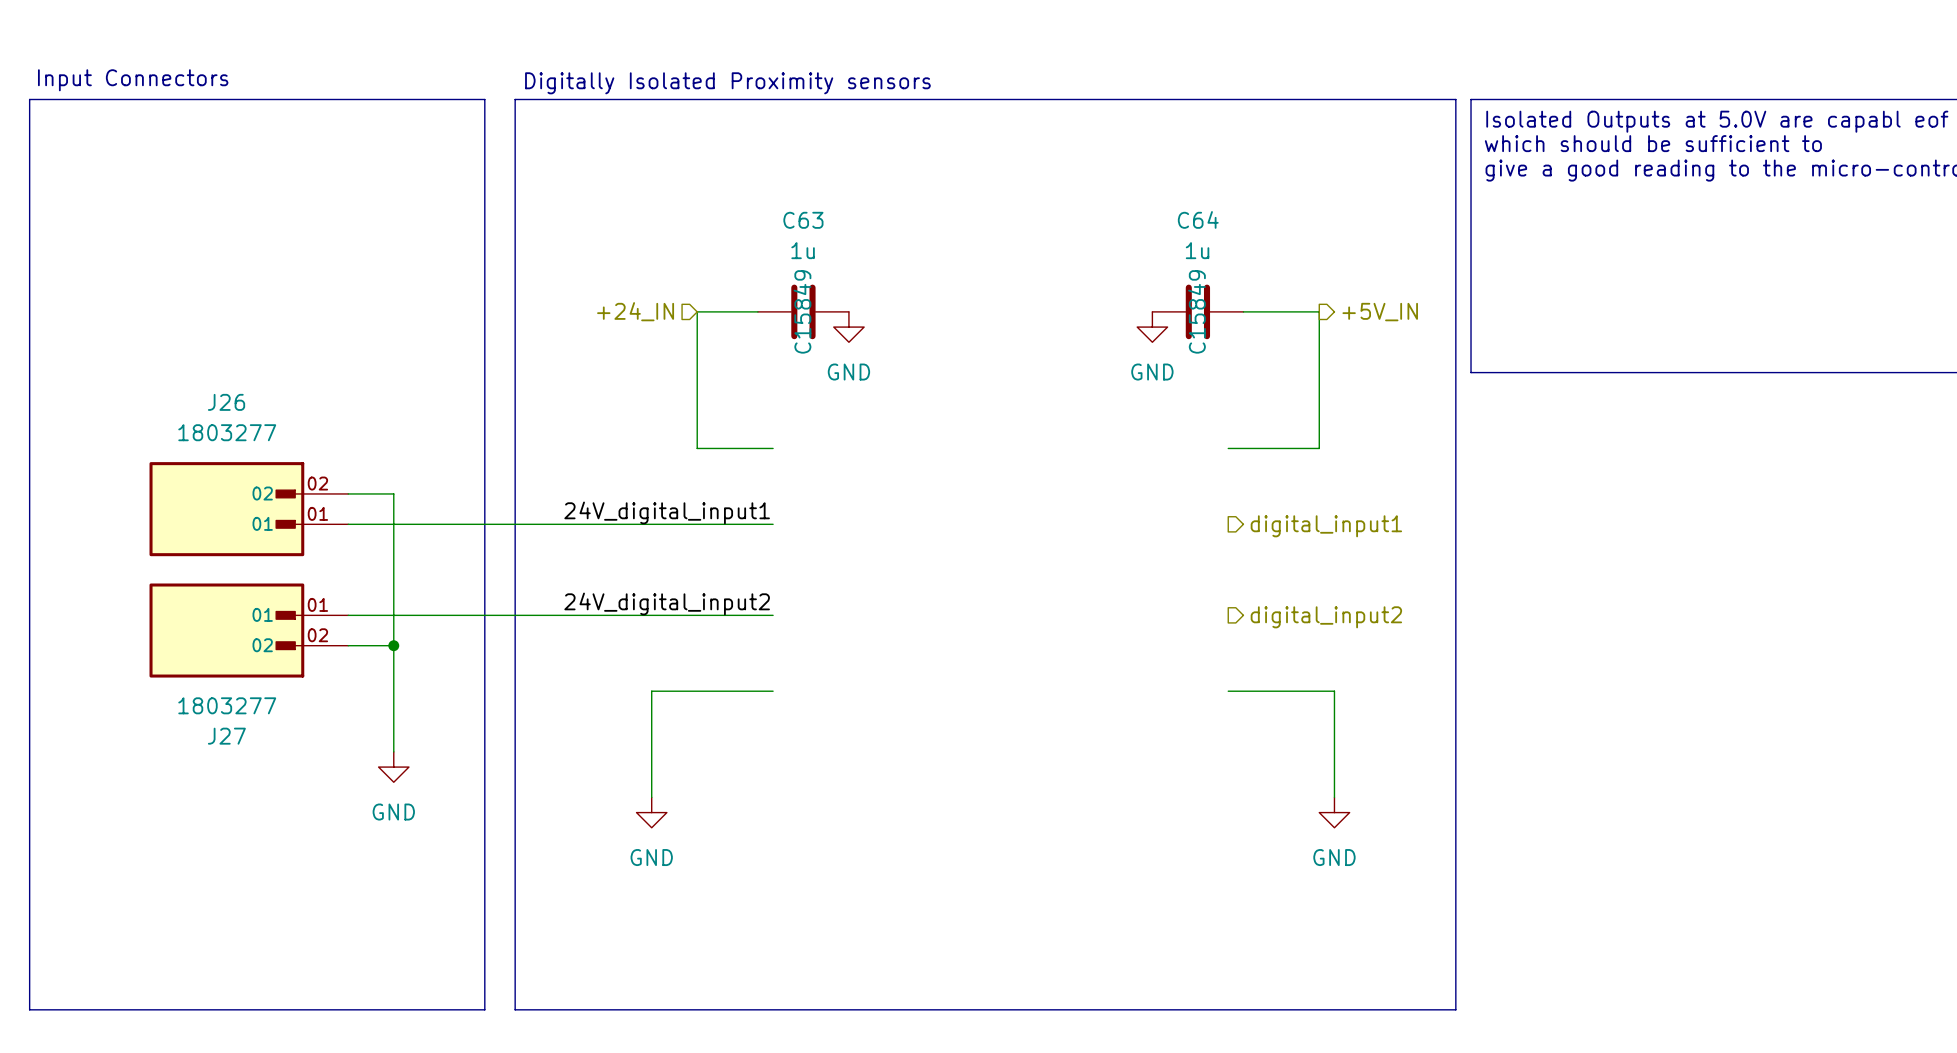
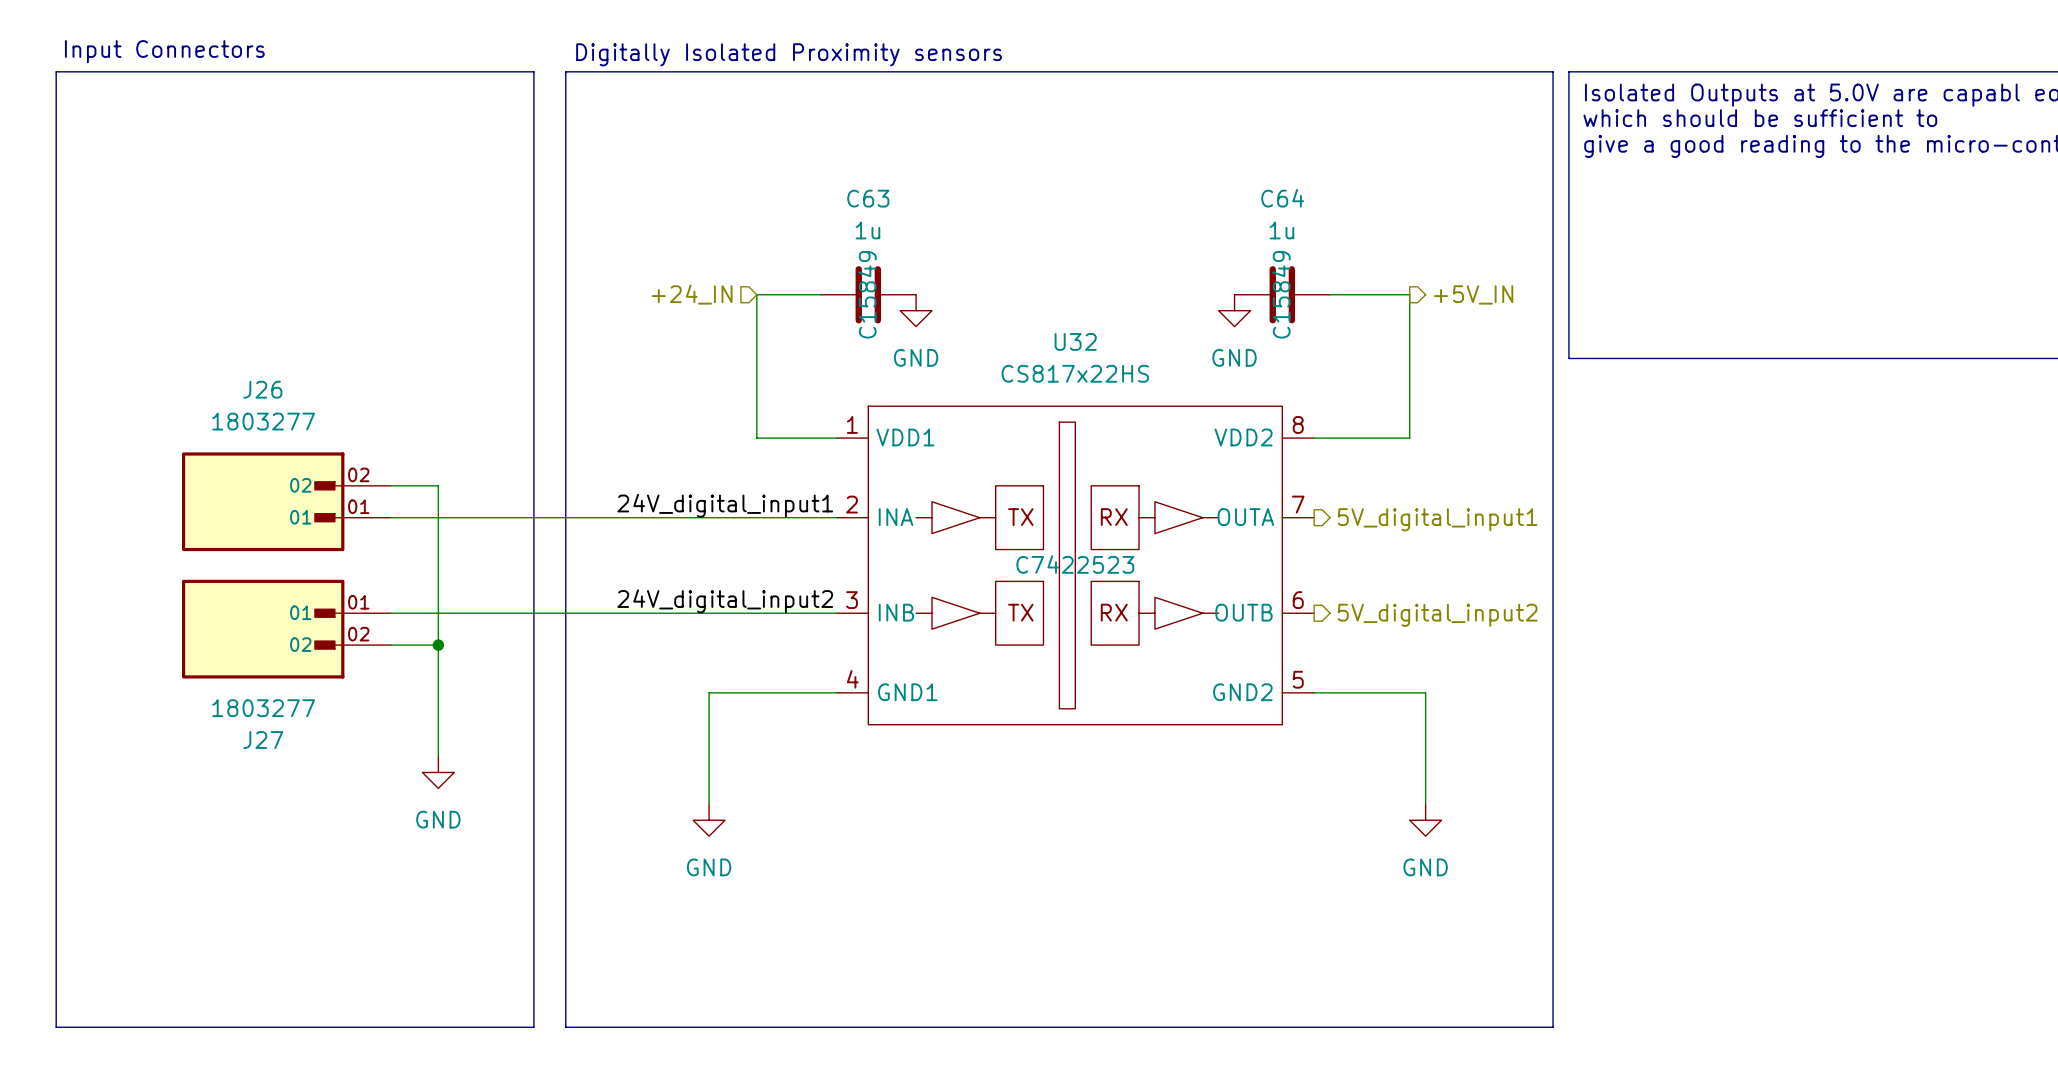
hierarchical label: digital_input1 (1326, 526) -> 5V_digital_input1 (1437, 519)
U32: none -> CS817x22HS (1075, 565)
hierarchical label: digital_input2 (1326, 617) -> 5V_digital_input2 (1437, 615)

